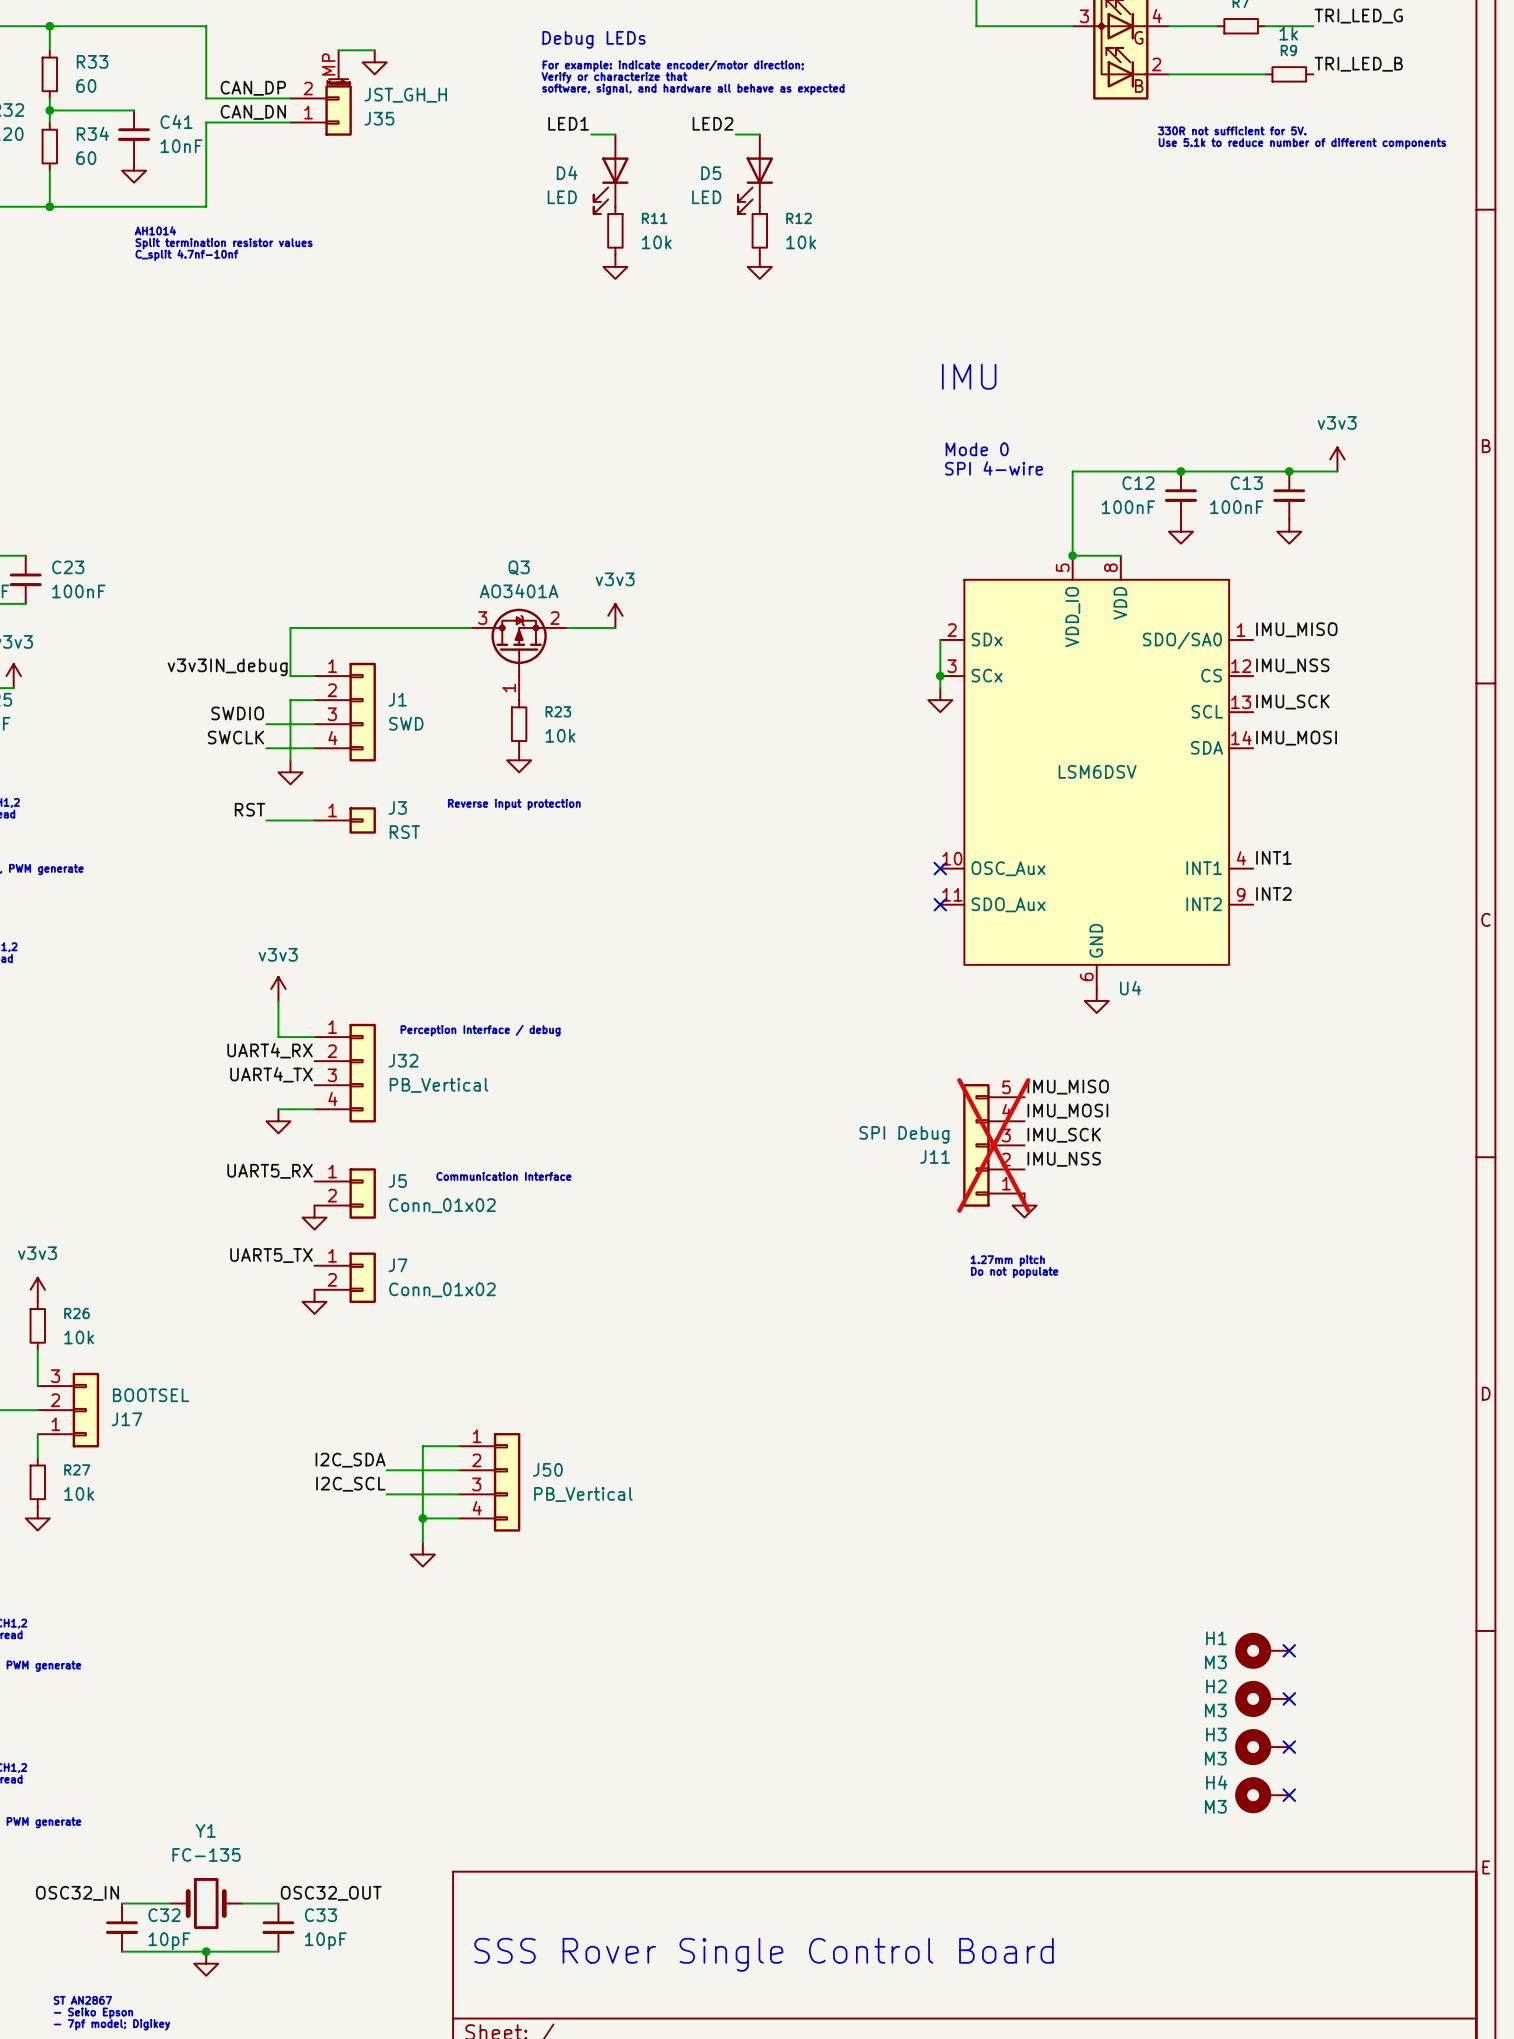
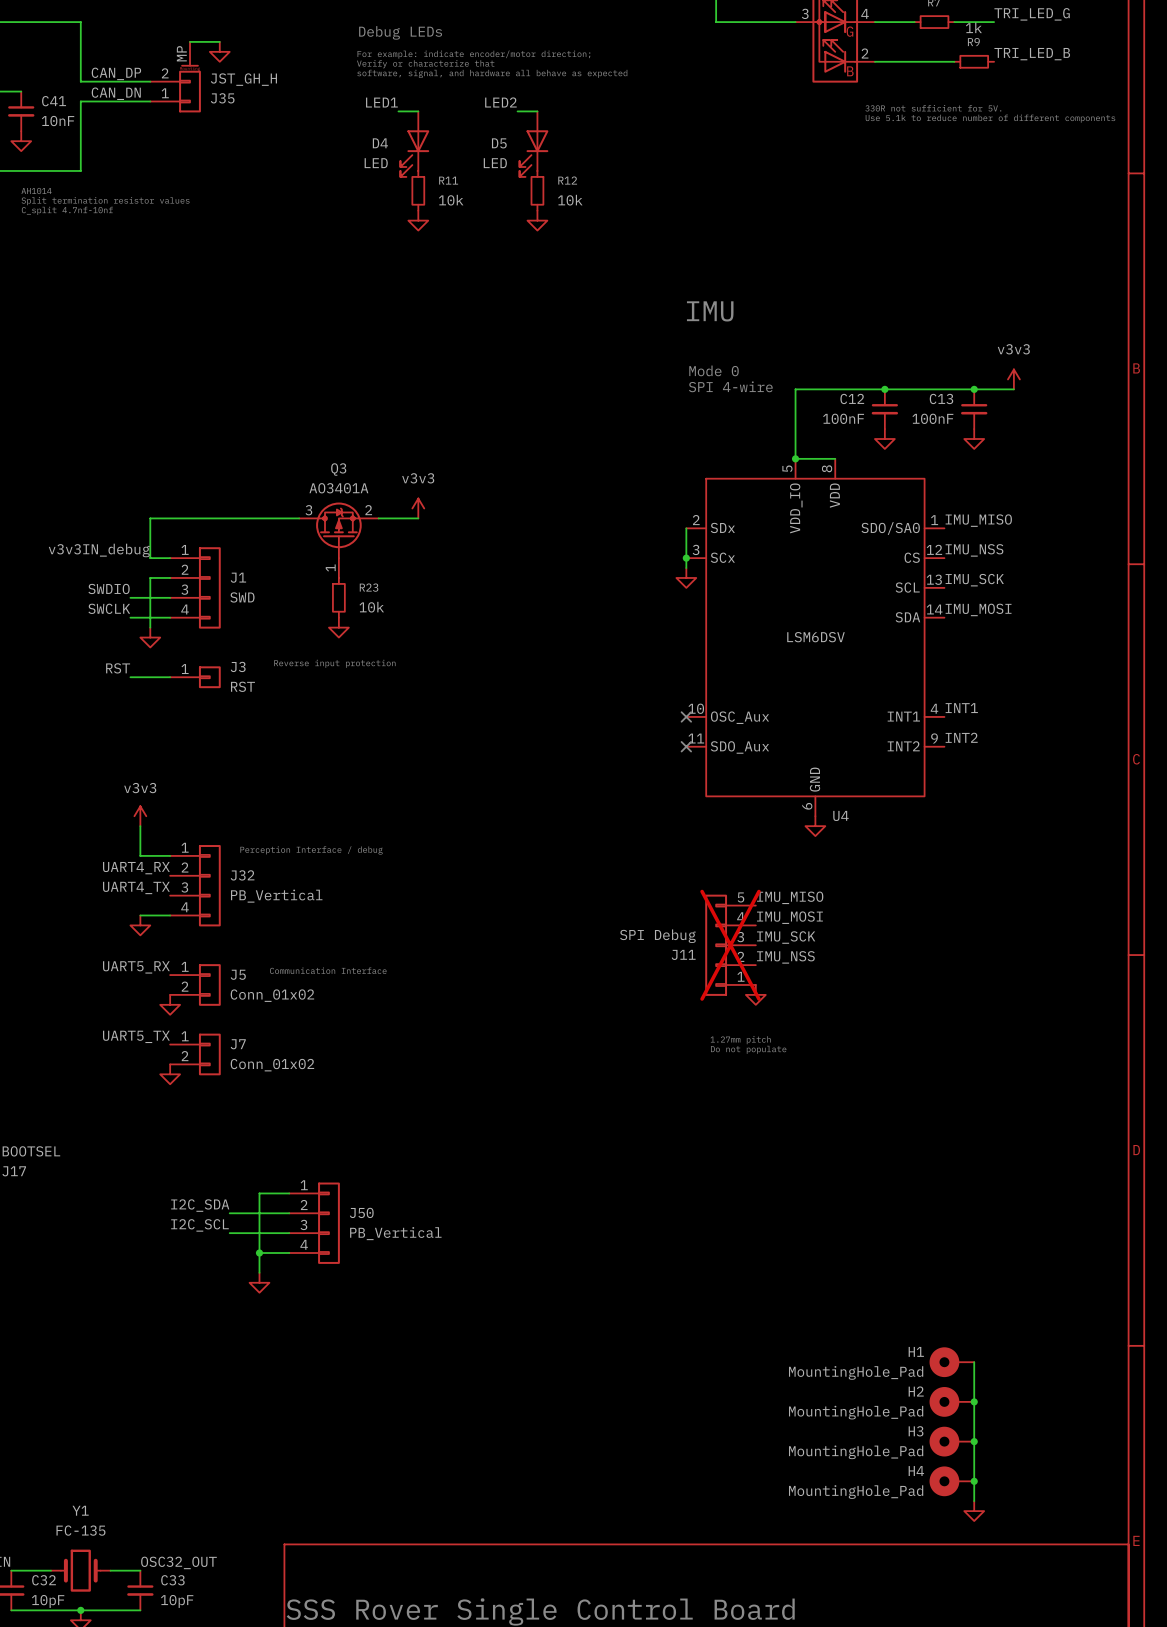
wire: none -> (974, 1362) (974, 1501)
no-connect mark: (1289, 1650) -> none
H1 value: M3 (1215, 1662) -> MountingHole_Pad (856, 1372)
no-connect mark: (1289, 1698) -> none
junction: none -> (974, 1401)
H2 value: M3 (1215, 1710) -> MountingHole_Pad (856, 1412)
no-connect mark: (1289, 1747) -> none
junction: none -> (974, 1441)
H3 value: M3 (1215, 1758) -> MountingHole_Pad (856, 1452)
no-connect mark: (1289, 1795) -> none
junction: none -> (974, 1481)
H4 value: M3 (1215, 1806) -> MountingHole_Pad (856, 1492)
power symbol: none -> (974, 1511)

